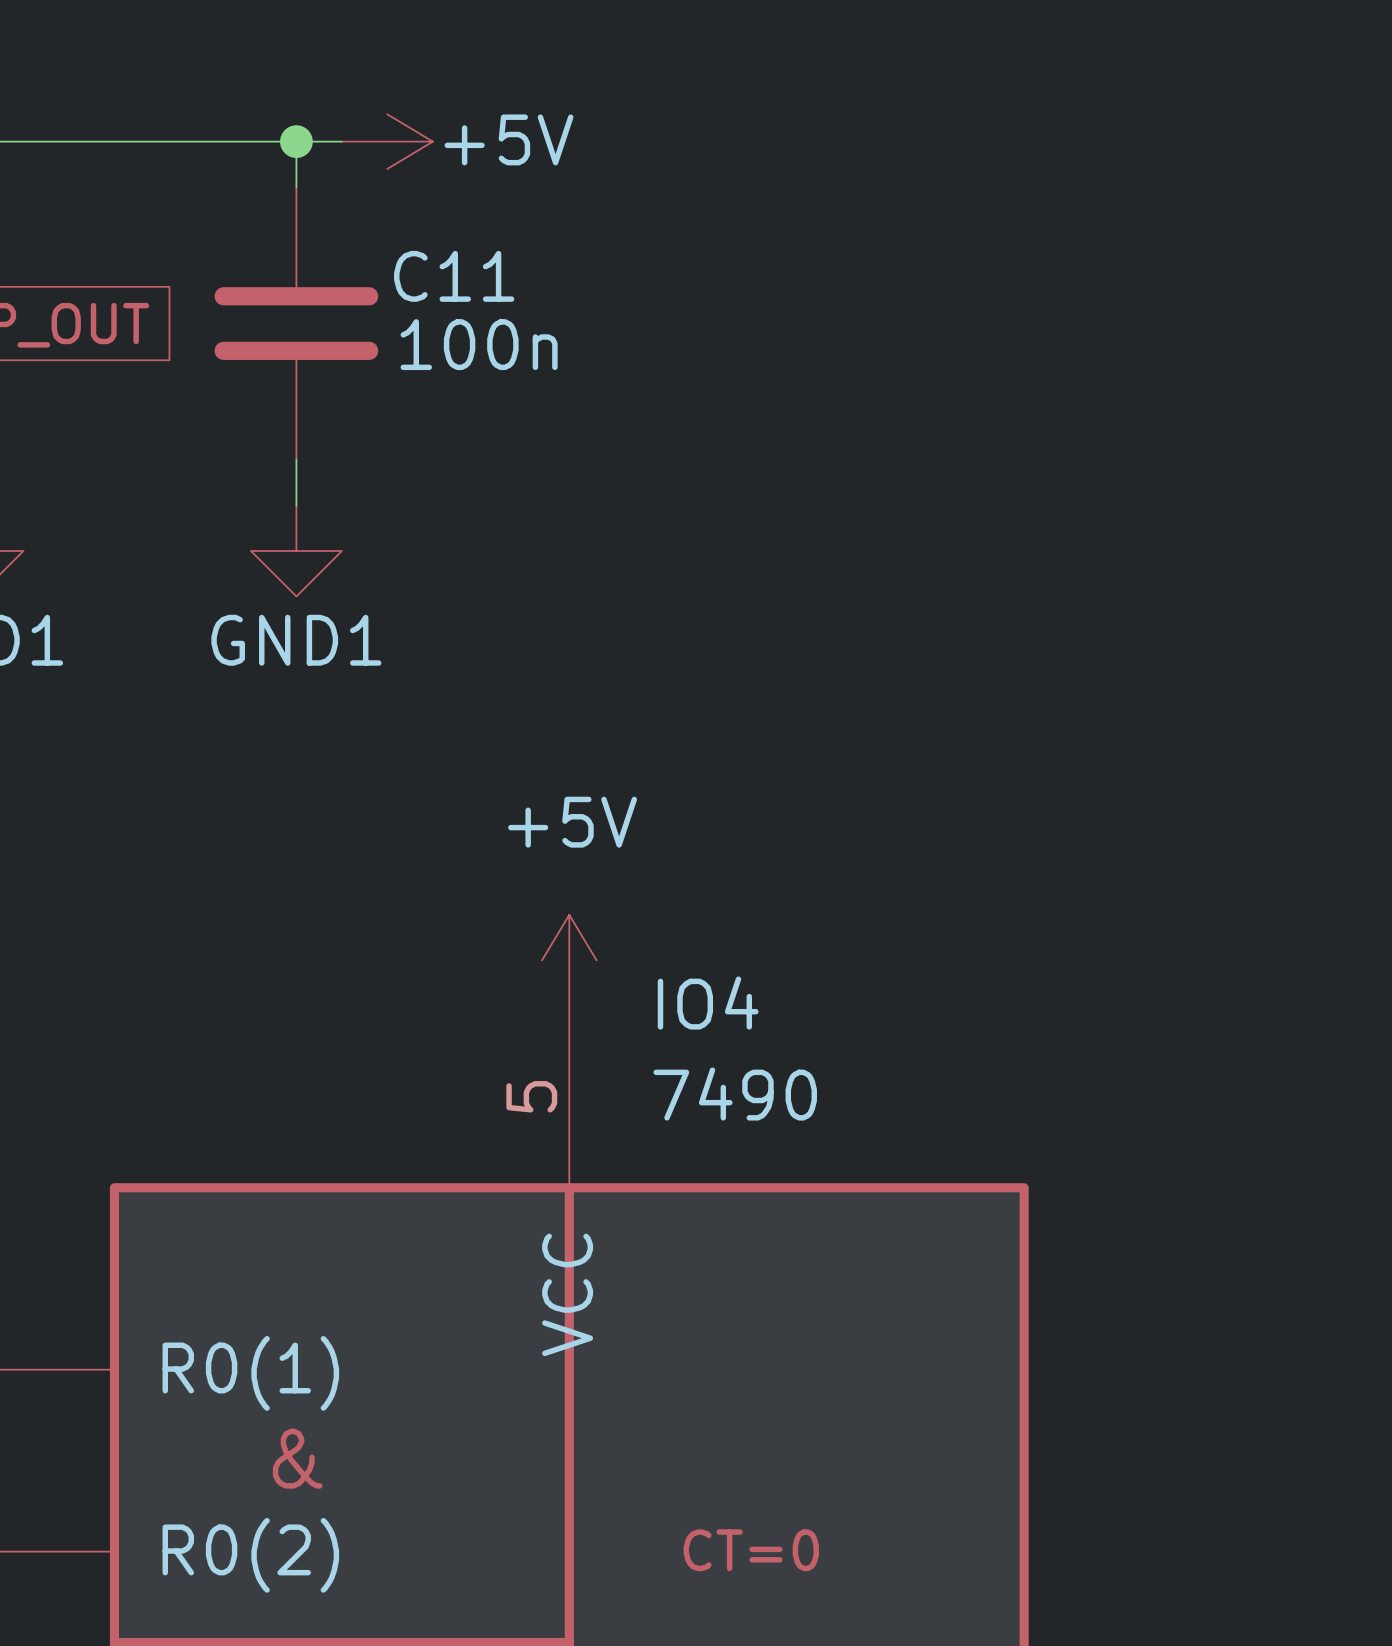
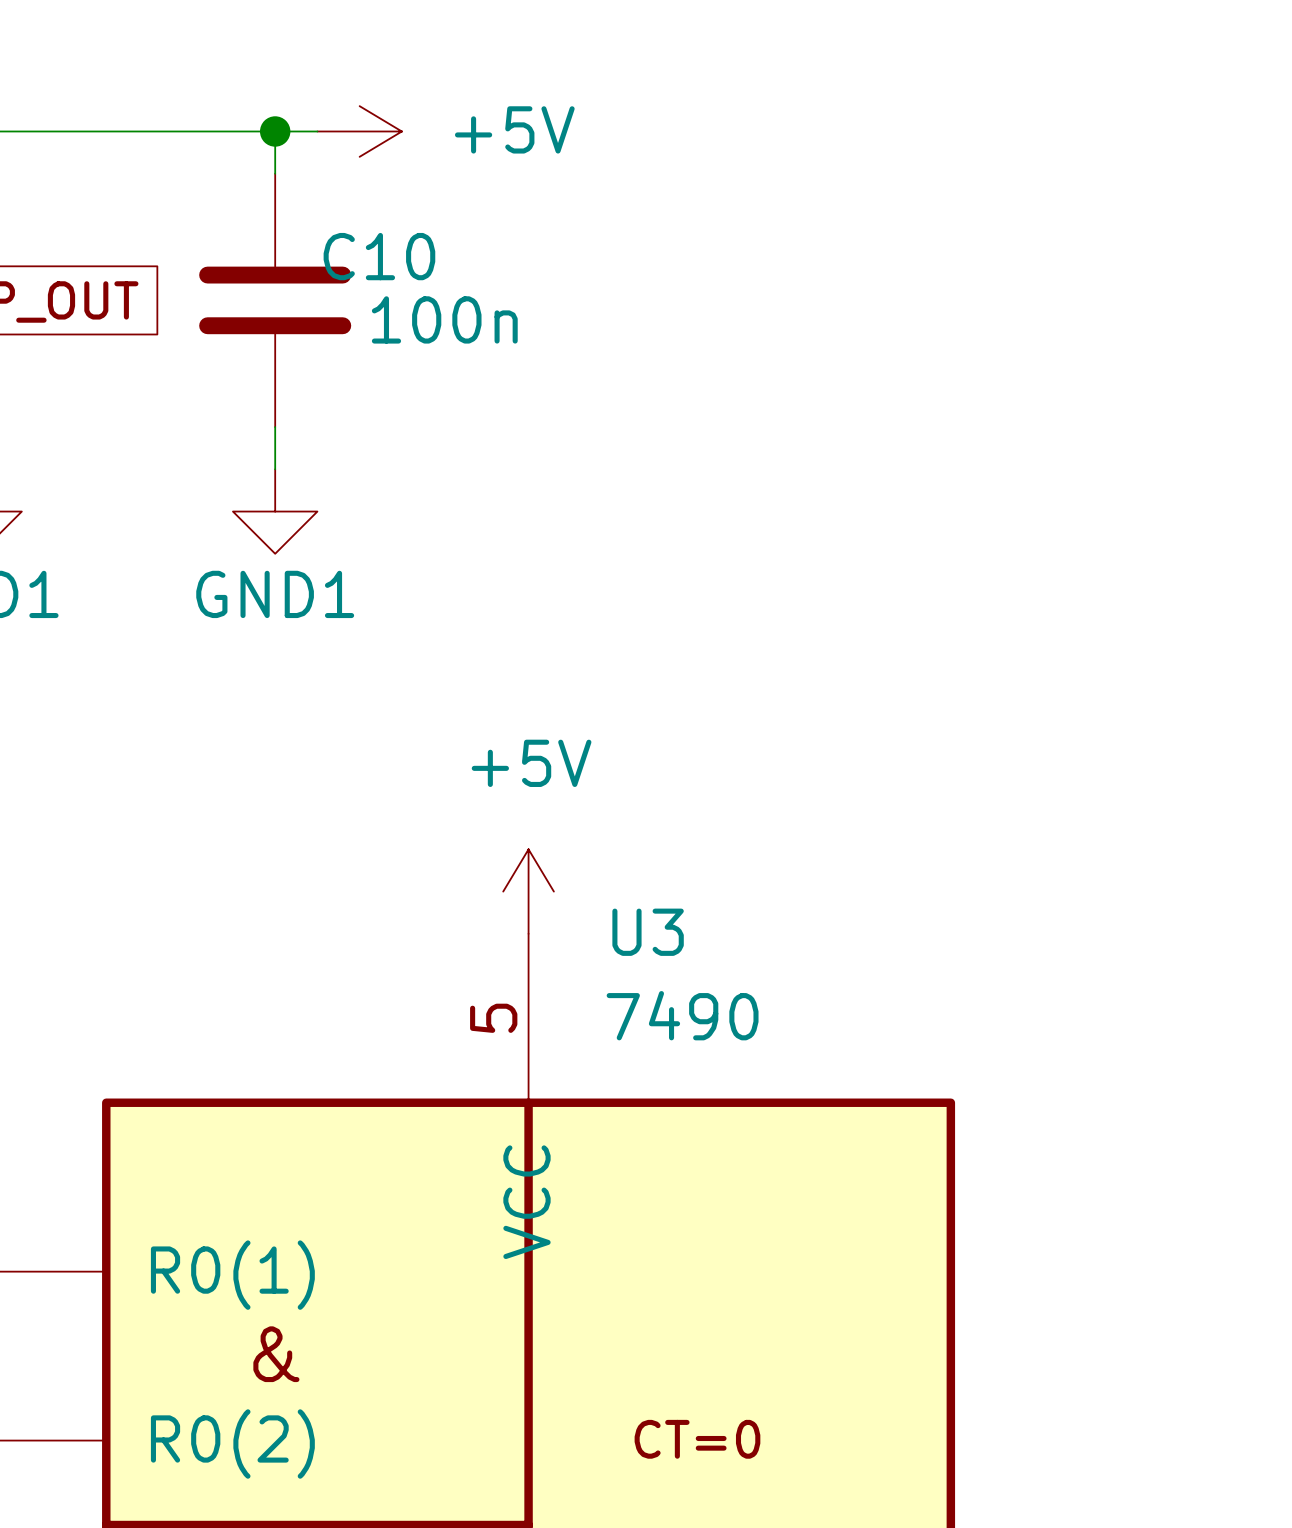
power symbol text position: +5V (509, 139) -> +5V (514, 129)
C11 name: C11 (454, 276) -> C10 (379, 256)
IO4 name: IO4 (708, 1003) -> U3 (648, 932)

